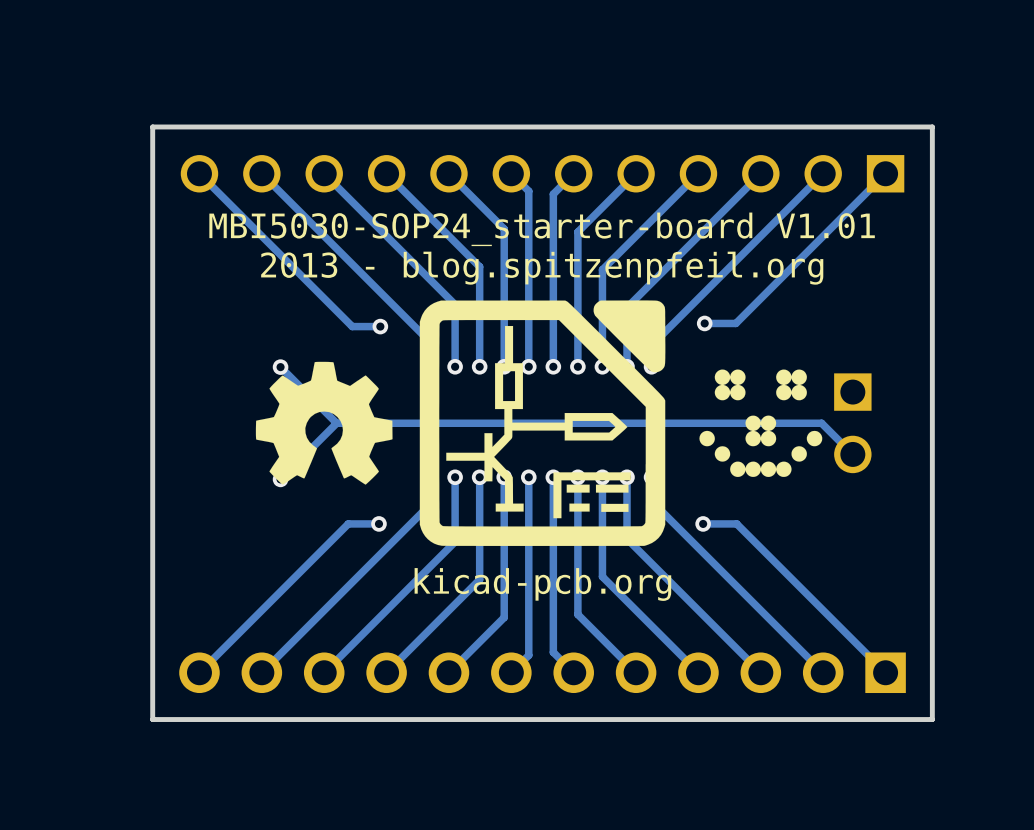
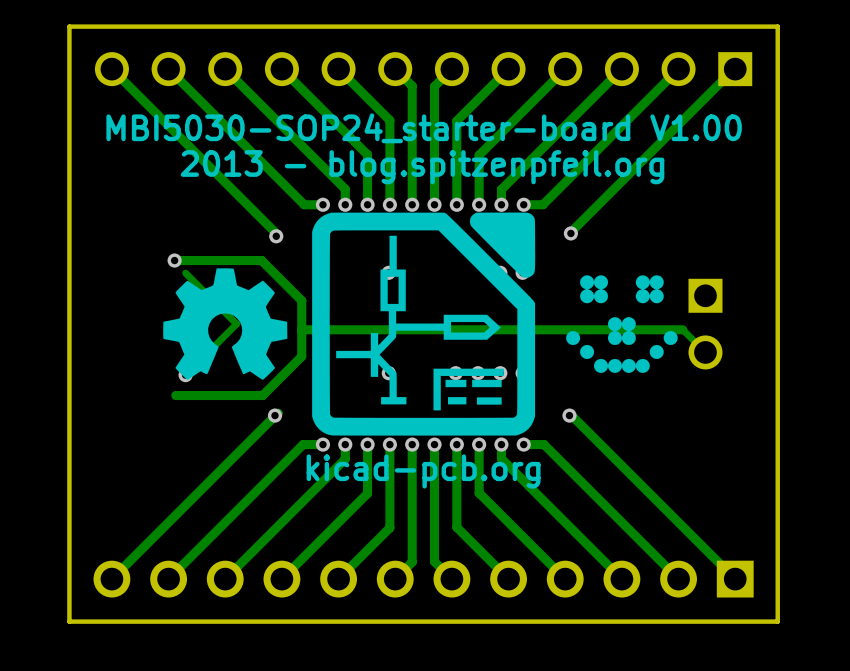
board edge: (932, 126) (152, 126) -> (777, 54) (777, 26) (69, 26) (69, 54)
track: none -> (111, 69) (276, 234)
track: none -> (168, 69) (304, 204) (322, 204)
track: none -> (225, 69) (345, 189) (345, 204)
track: none -> (281, 69) (367, 154) (367, 204)
track: none -> (338, 69) (389, 120) (389, 204)
track: none -> (395, 69) (412, 86) (412, 204)
track: none -> (451, 69) (434, 86) (434, 204)
track: none -> (508, 69) (456, 120) (456, 204)
track: none -> (565, 69) (479, 155) (479, 204)
track: none -> (621, 69) (501, 189) (501, 204)
track: none -> (678, 69) (542, 204) (523, 204)
track: none -> (735, 69) (569, 233)
track: (199, 173) (352, 326) (380, 326) -> none
track: (261, 173) (430, 342) (430, 366) -> none
track: (324, 173) (455, 304) (455, 366) -> none
track: (386, 173) (479, 266) (479, 366) -> none
track: (448, 173) (504, 229) (504, 366) -> none
track: (511, 173) (528, 191) (528, 366) -> none
part position: (542, 173) -> (423, 69)
track: (573, 173) (553, 194) (553, 366) -> none
track: (636, 173) (577, 231) (577, 366) -> none
track: (698, 173) (602, 269) (602, 366) -> none
track: (760, 173) (627, 307) (627, 366) -> none
track: (823, 173) (651, 345) (651, 366) -> none
track: (885, 173) (735, 323) (704, 323) -> none
text: MBI5030-SOP24_starter-board V1.01 (542, 229) -> MBI5030-SOP24_starter-board V1.00 (424, 128)
text position: 2013 - blog.spitzenpfeil.org (542, 268) -> 2013 - blog.spitzenpfeil.org (422, 167)
via: none -> (322, 204)
via: none -> (345, 204)
via: none -> (367, 204)
via: none -> (389, 204)
via: none -> (412, 204)
via: none -> (434, 204)
via: none -> (456, 204)
via: none -> (479, 204)
via: none -> (501, 204)
via: none -> (523, 204)
track: none -> (174, 260) (261, 260) (301, 300) (301, 356) (262, 395) (175, 395)
via: (455, 366) -> none
via: (479, 366) -> none
via: (528, 366) -> none
via: (553, 366) -> none
via: (577, 366) -> none
via: (602, 366) -> none
via position: (280, 367) -> (174, 260)
track: (336, 423) (821, 423) (827, 429) -> (301, 329) (682, 329)
track: (430, 477) (430, 504) (261, 672) -> none
track: (455, 477) (455, 541) (324, 672) -> none
via: (455, 477) -> none
track: (479, 477) (479, 579) (386, 672) -> none
via: (479, 477) -> none
track: (504, 477) (504, 617) (448, 672) -> none
track: (528, 477) (528, 655) (511, 672) -> none
via: (528, 477) -> none
track: (553, 477) (553, 652) (573, 672) -> none
via: (553, 477) -> none
track: (577, 477) (577, 614) (636, 672) -> none
track: (602, 477) (602, 576) (698, 672) -> none
track: (627, 477) (627, 538) (760, 672) -> none
track: (651, 477) (651, 501) (823, 672) -> none
track: none -> (278, 413) (111, 579)
track: none -> (570, 413) (735, 579)
track: (378, 523) (348, 523) (199, 672) -> none
track: (703, 523) (736, 523) (885, 672) -> none
track: none -> (322, 444) (303, 444) (168, 579)
via: none -> (322, 444)
track: none -> (345, 444) (345, 459) (225, 579)
via: none -> (345, 444)
track: none -> (367, 444) (367, 493) (281, 579)
via: none -> (367, 444)
track: none -> (389, 444) (389, 527) (338, 579) (338, 577)
via: none -> (389, 444)
track: none -> (412, 444) (412, 562) (395, 579)
via: none -> (412, 444)
track: none -> (434, 444) (434, 561) (451, 579)
via: none -> (434, 444)
track: none -> (456, 444) (456, 527) (508, 577)
via: none -> (456, 444)
track: none -> (479, 444) (479, 492) (565, 579)
via: none -> (479, 444)
track: none -> (501, 444) (501, 458) (621, 579)
via: none -> (501, 444)
track: none -> (523, 444) (544, 444) (678, 579)
via: none -> (523, 444)
part position: (542, 672) -> (423, 579)
board edge: (932, 719) (152, 719) -> (777, 593) (777, 621) (69, 621) (69, 593)

